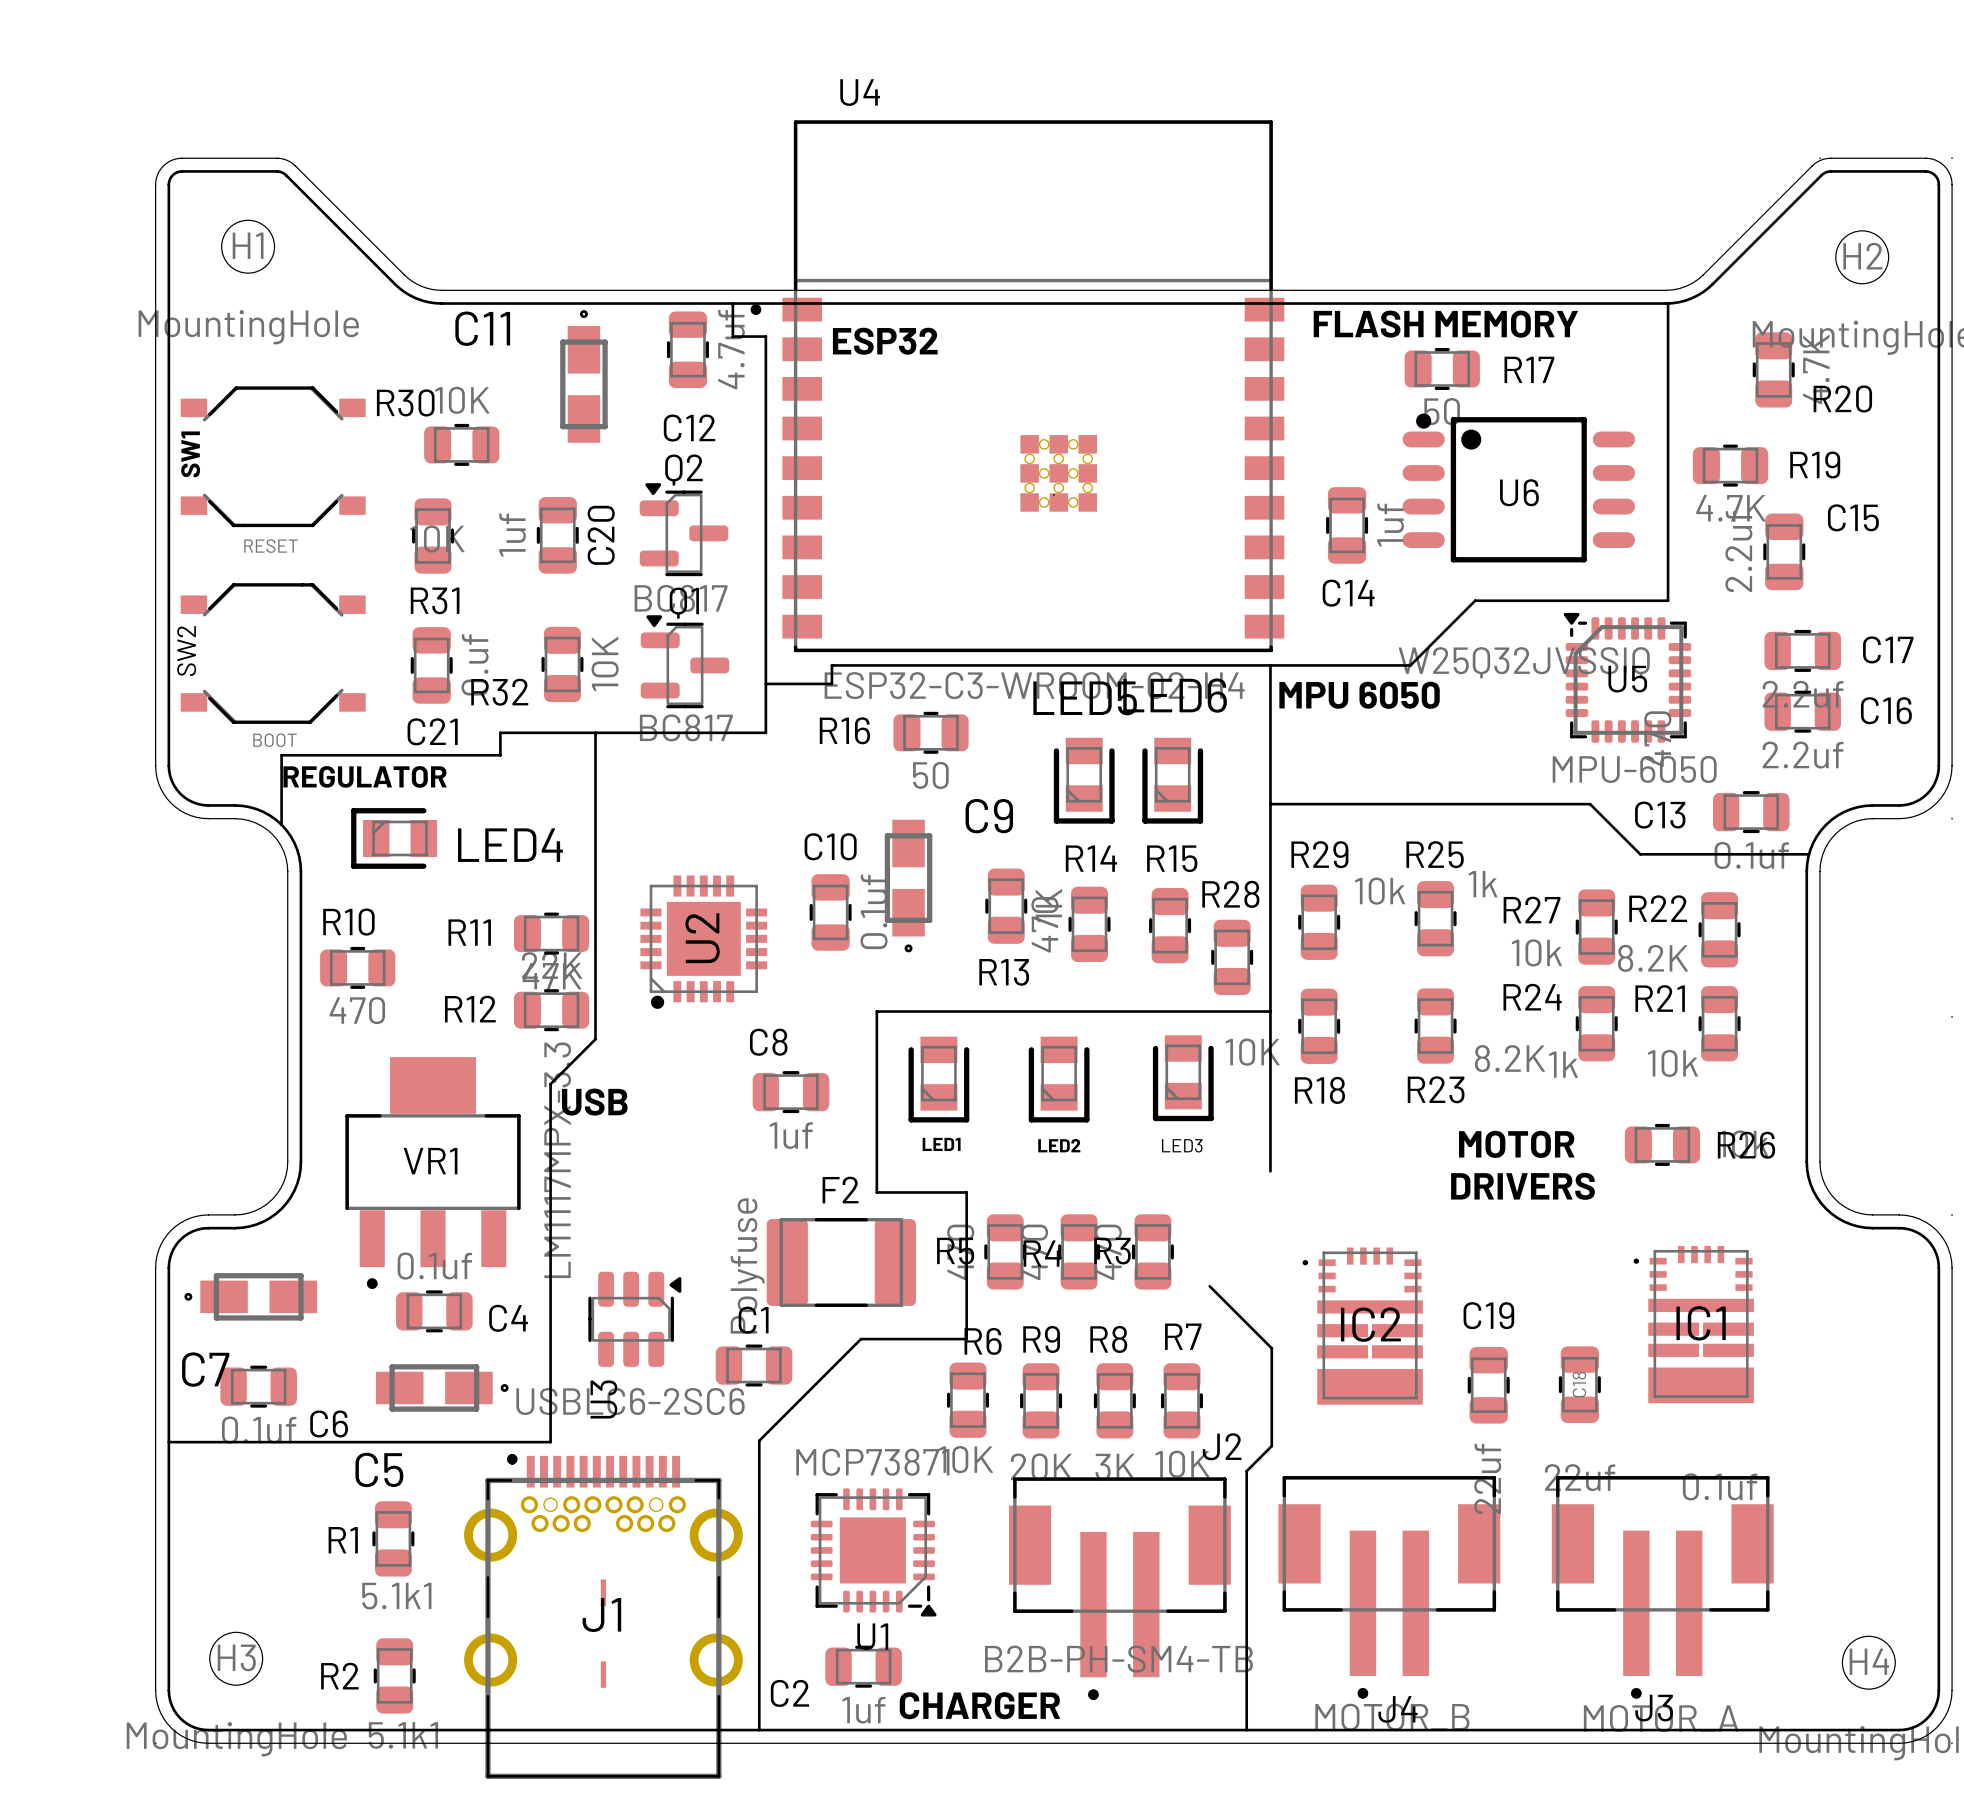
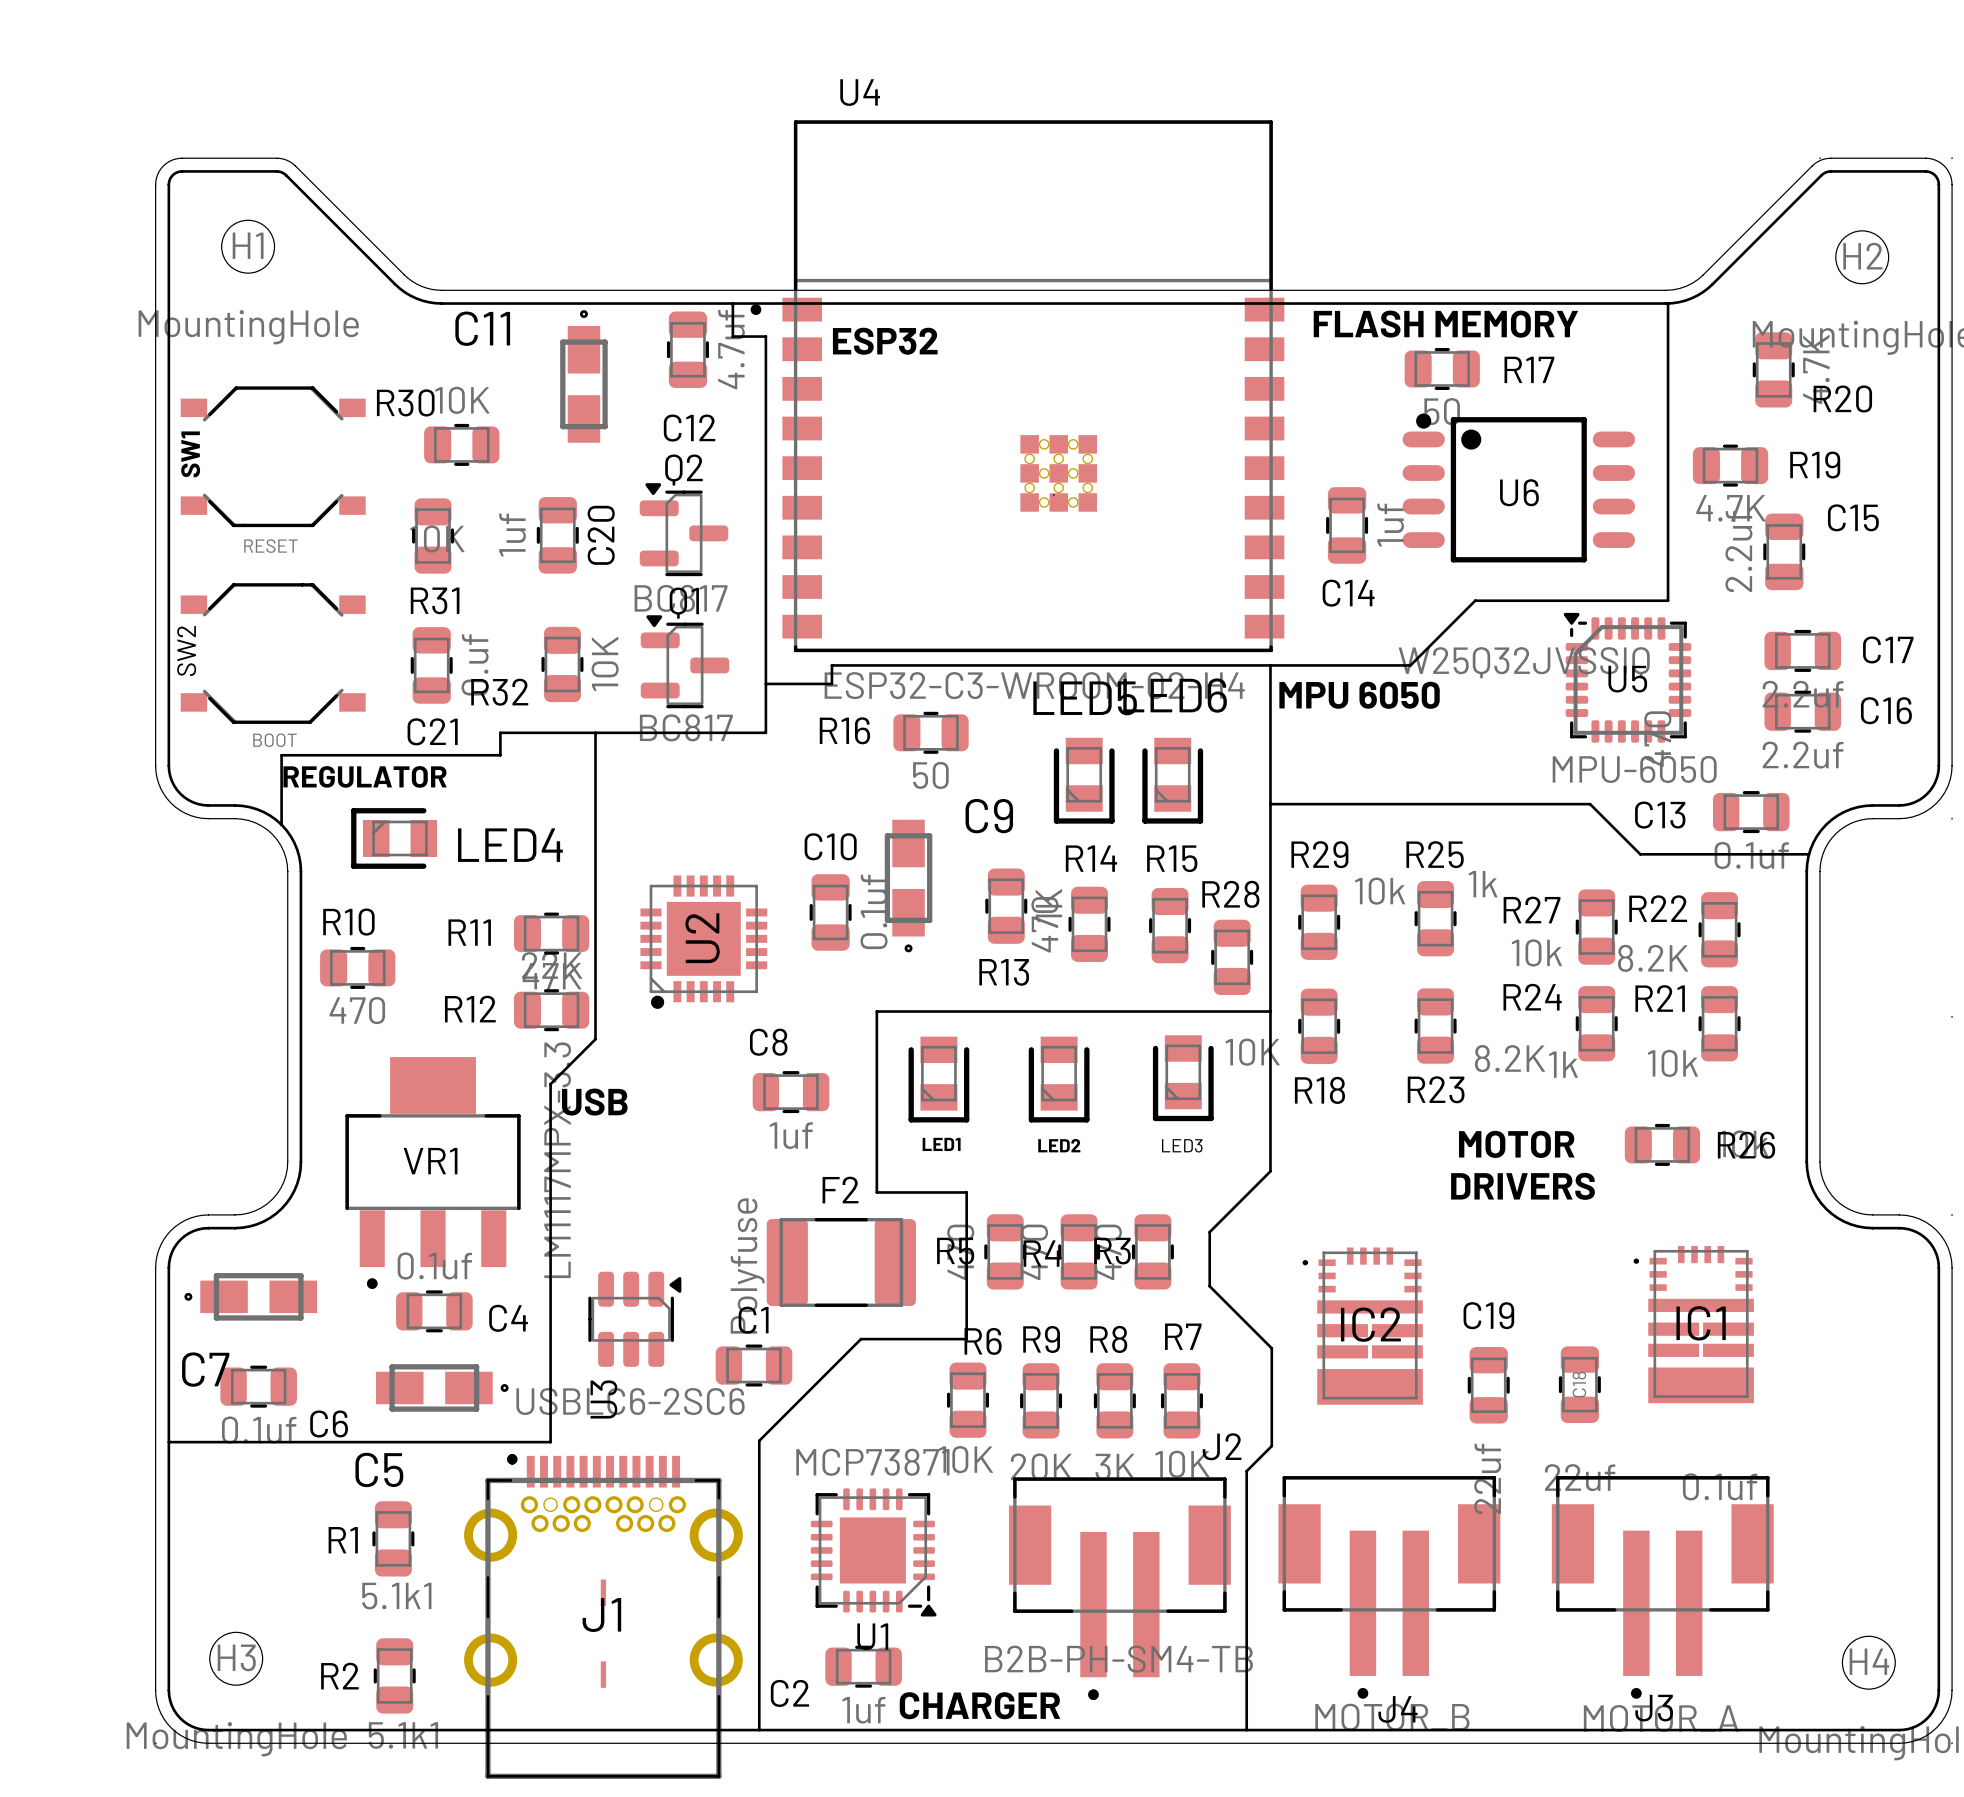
line: none -> (1270, 1171) (1209, 1232) (1209, 1286)

